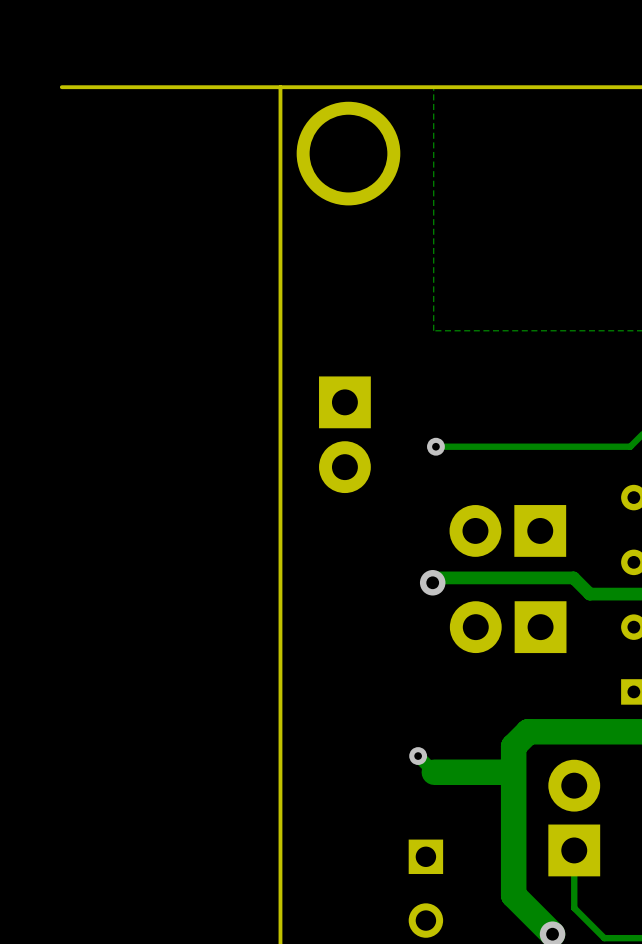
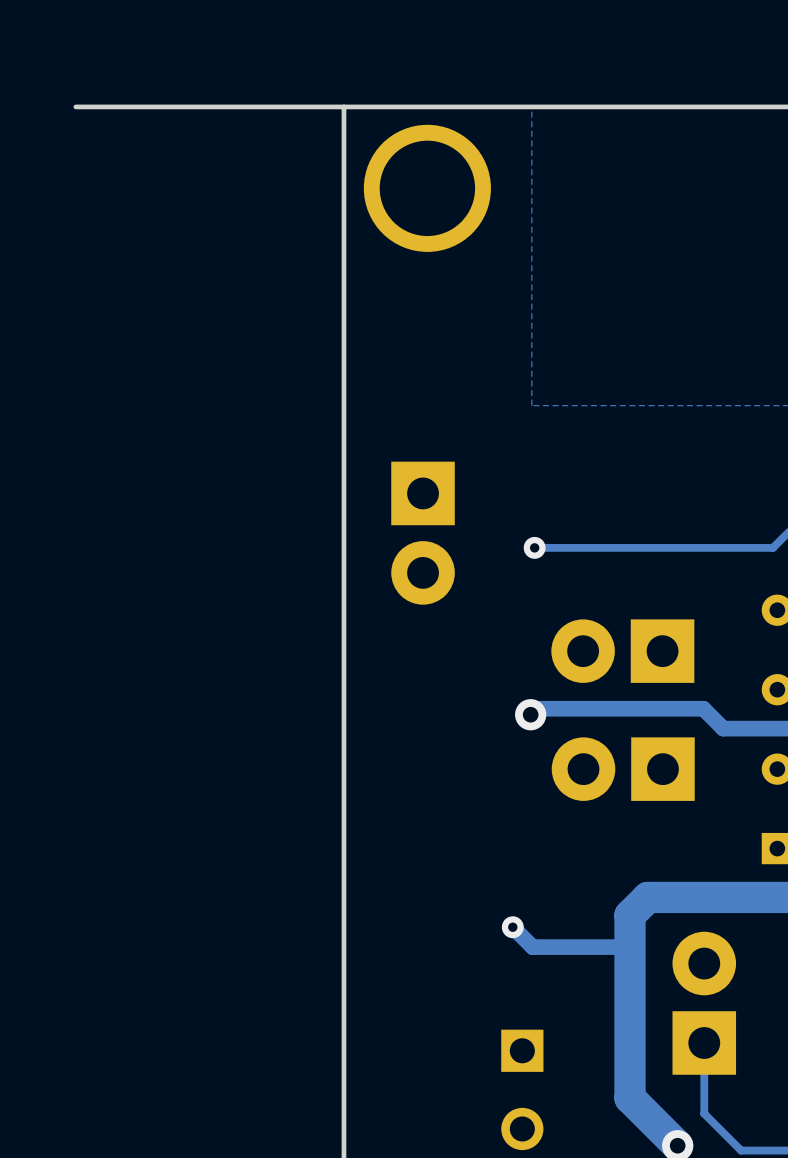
track width: thick (510, 772) (434, 772) -> thin (626, 947) (532, 947)

